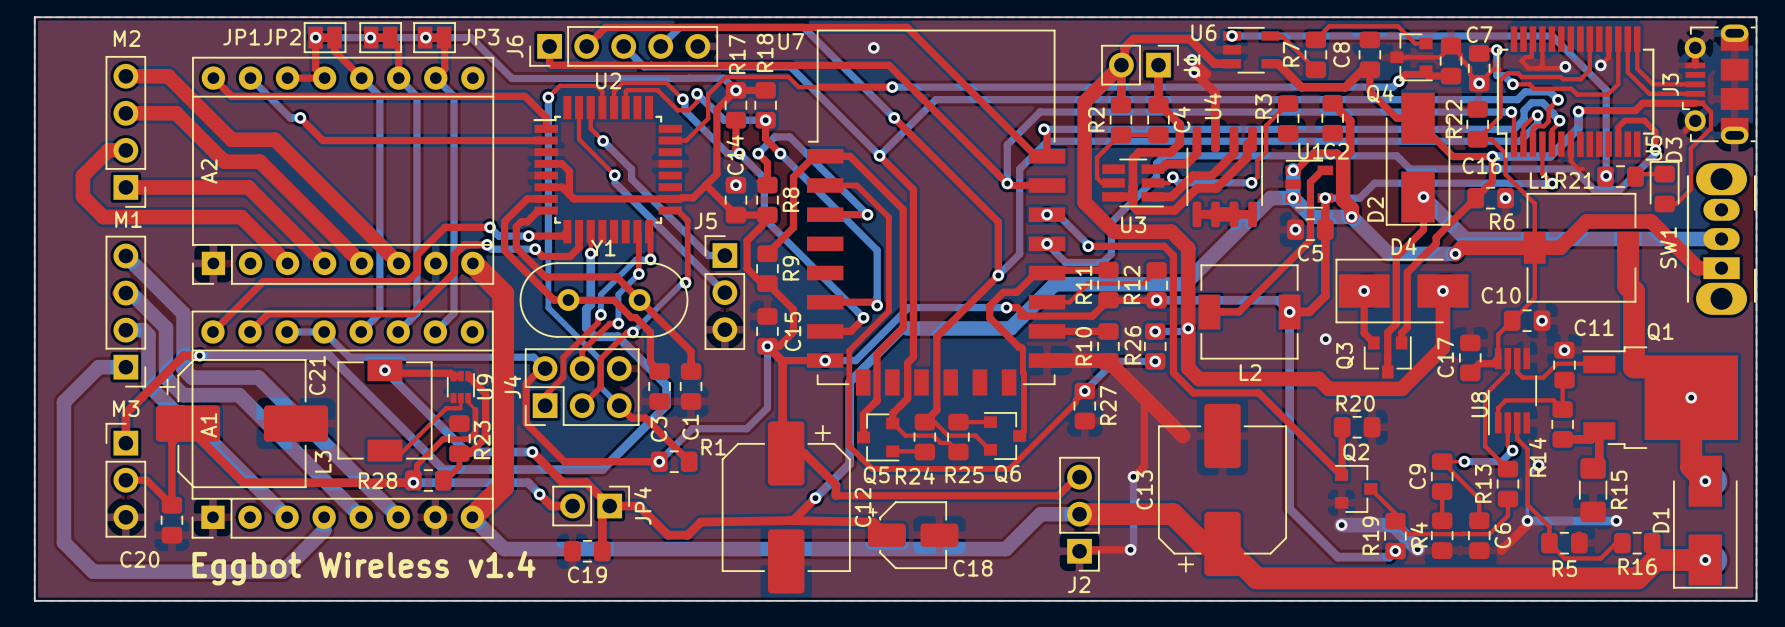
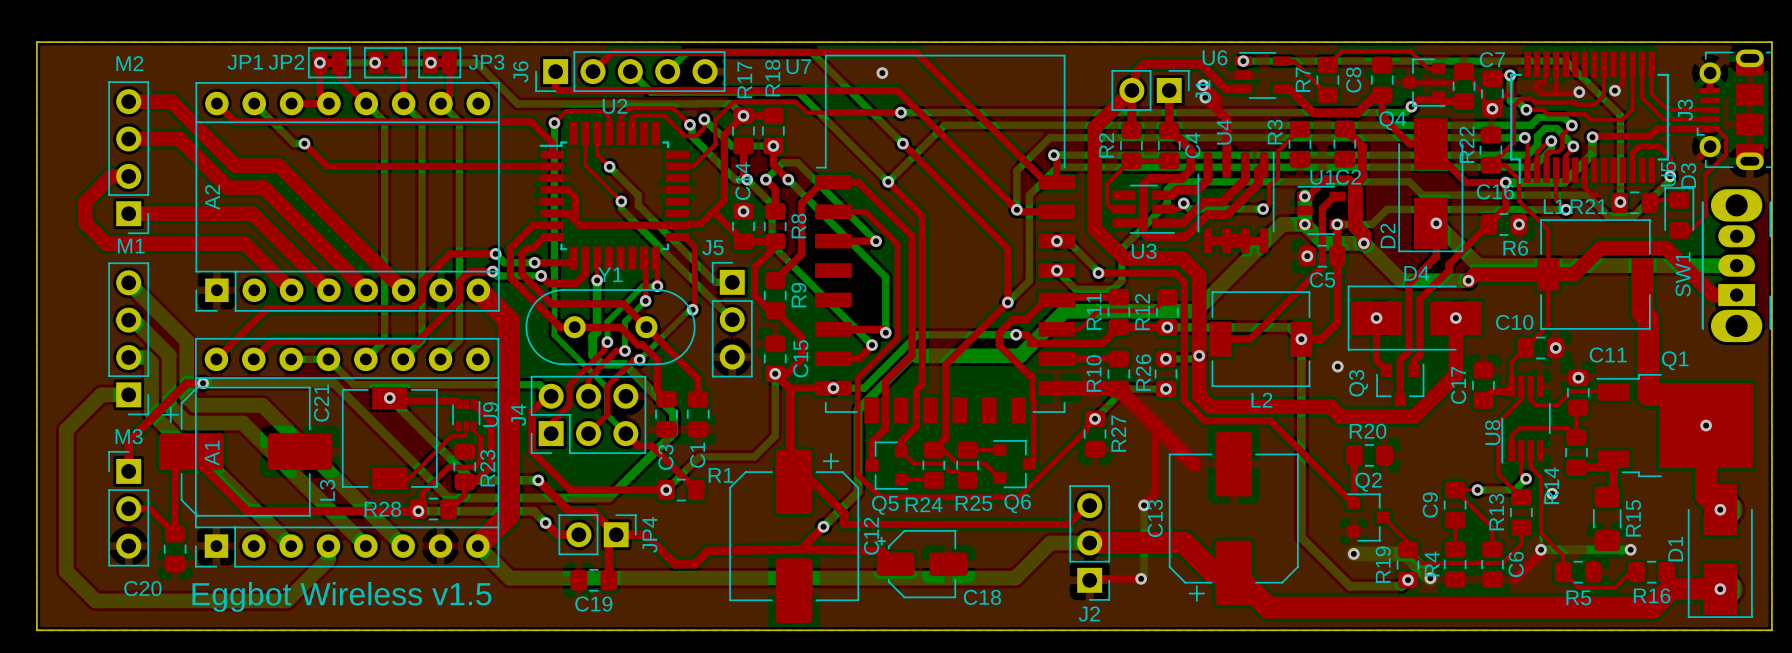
text: Eggbot Wireless v1.4 (363, 568) -> Eggbot Wireless v1.5 (341, 596)

